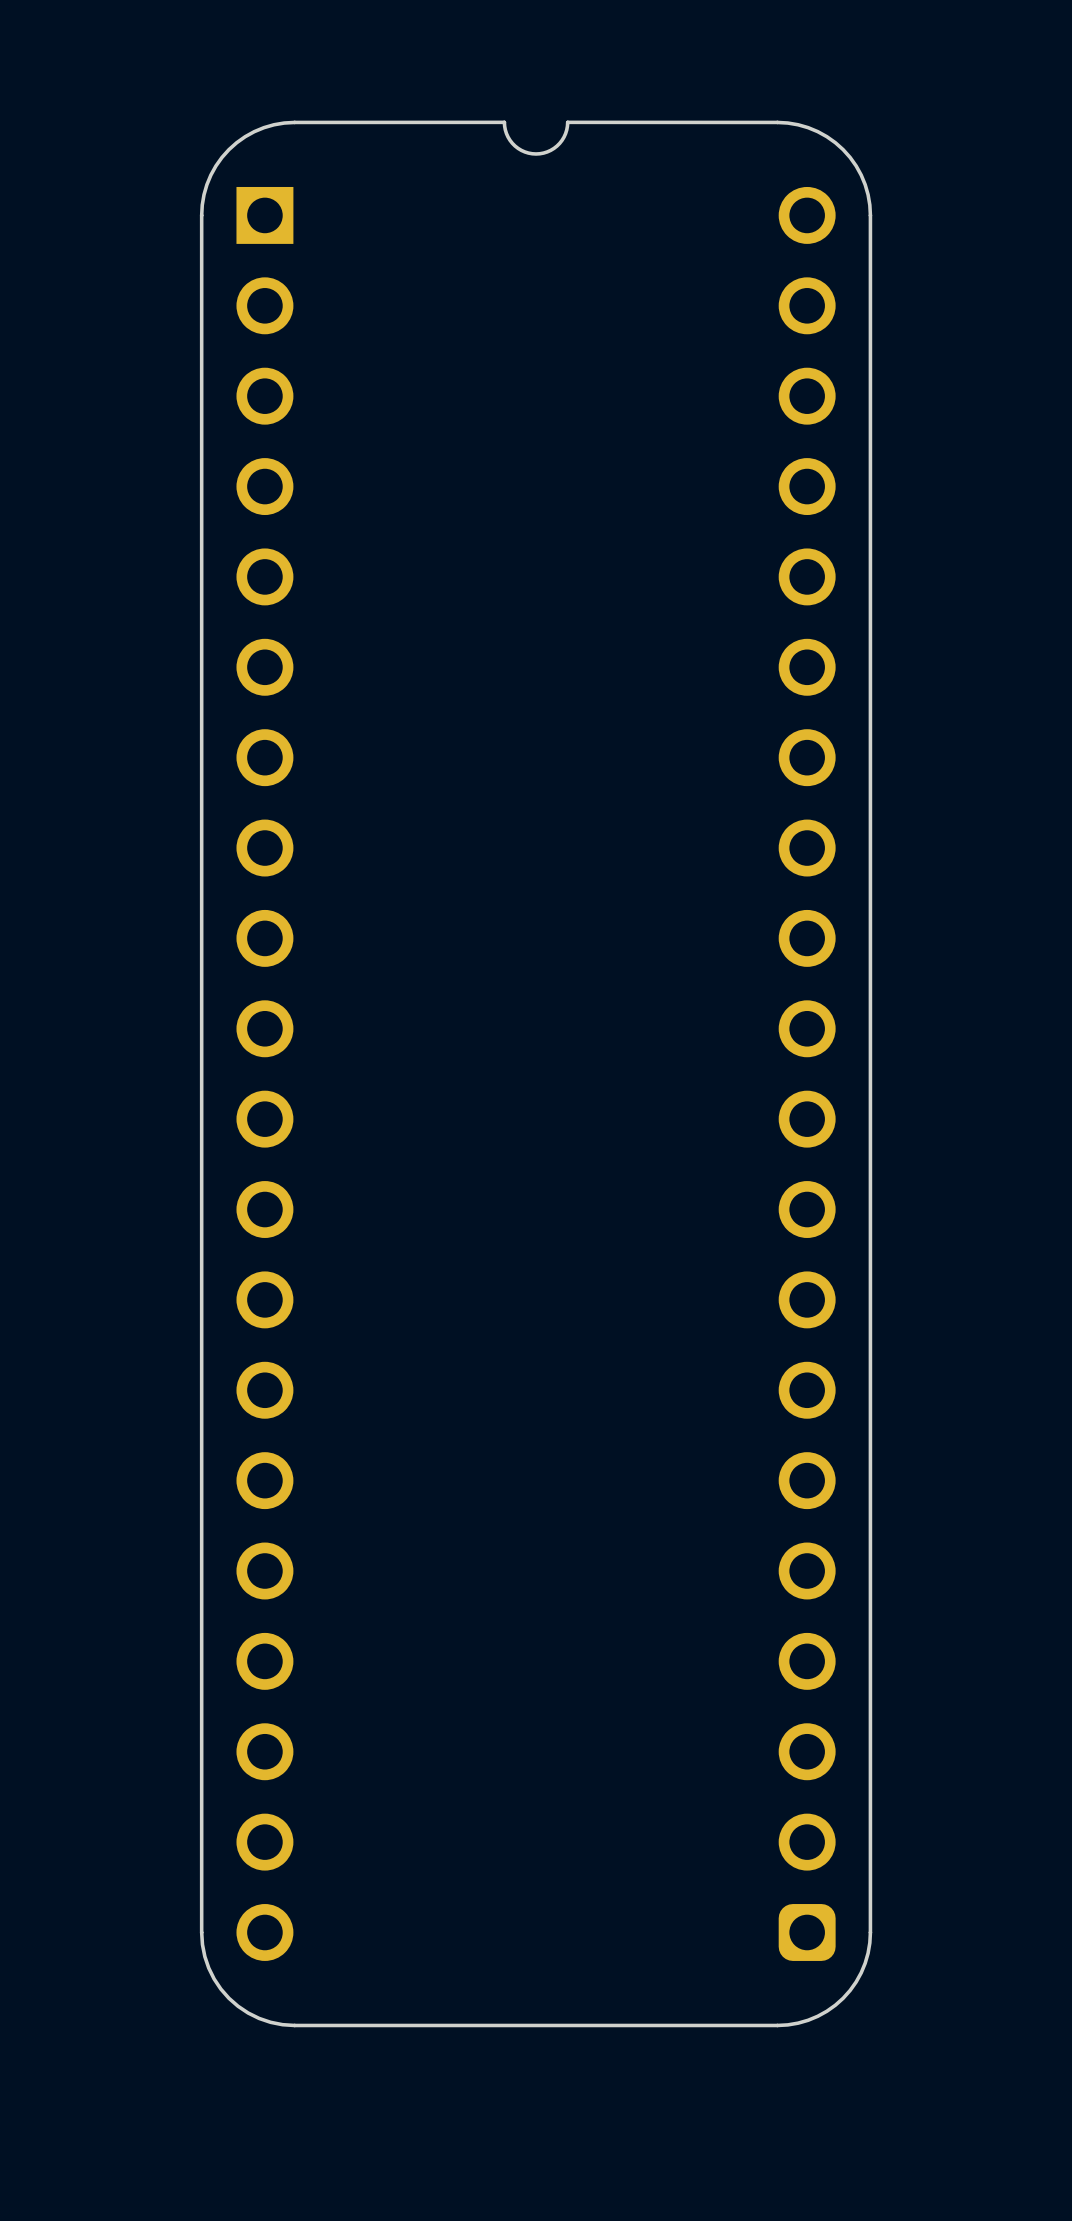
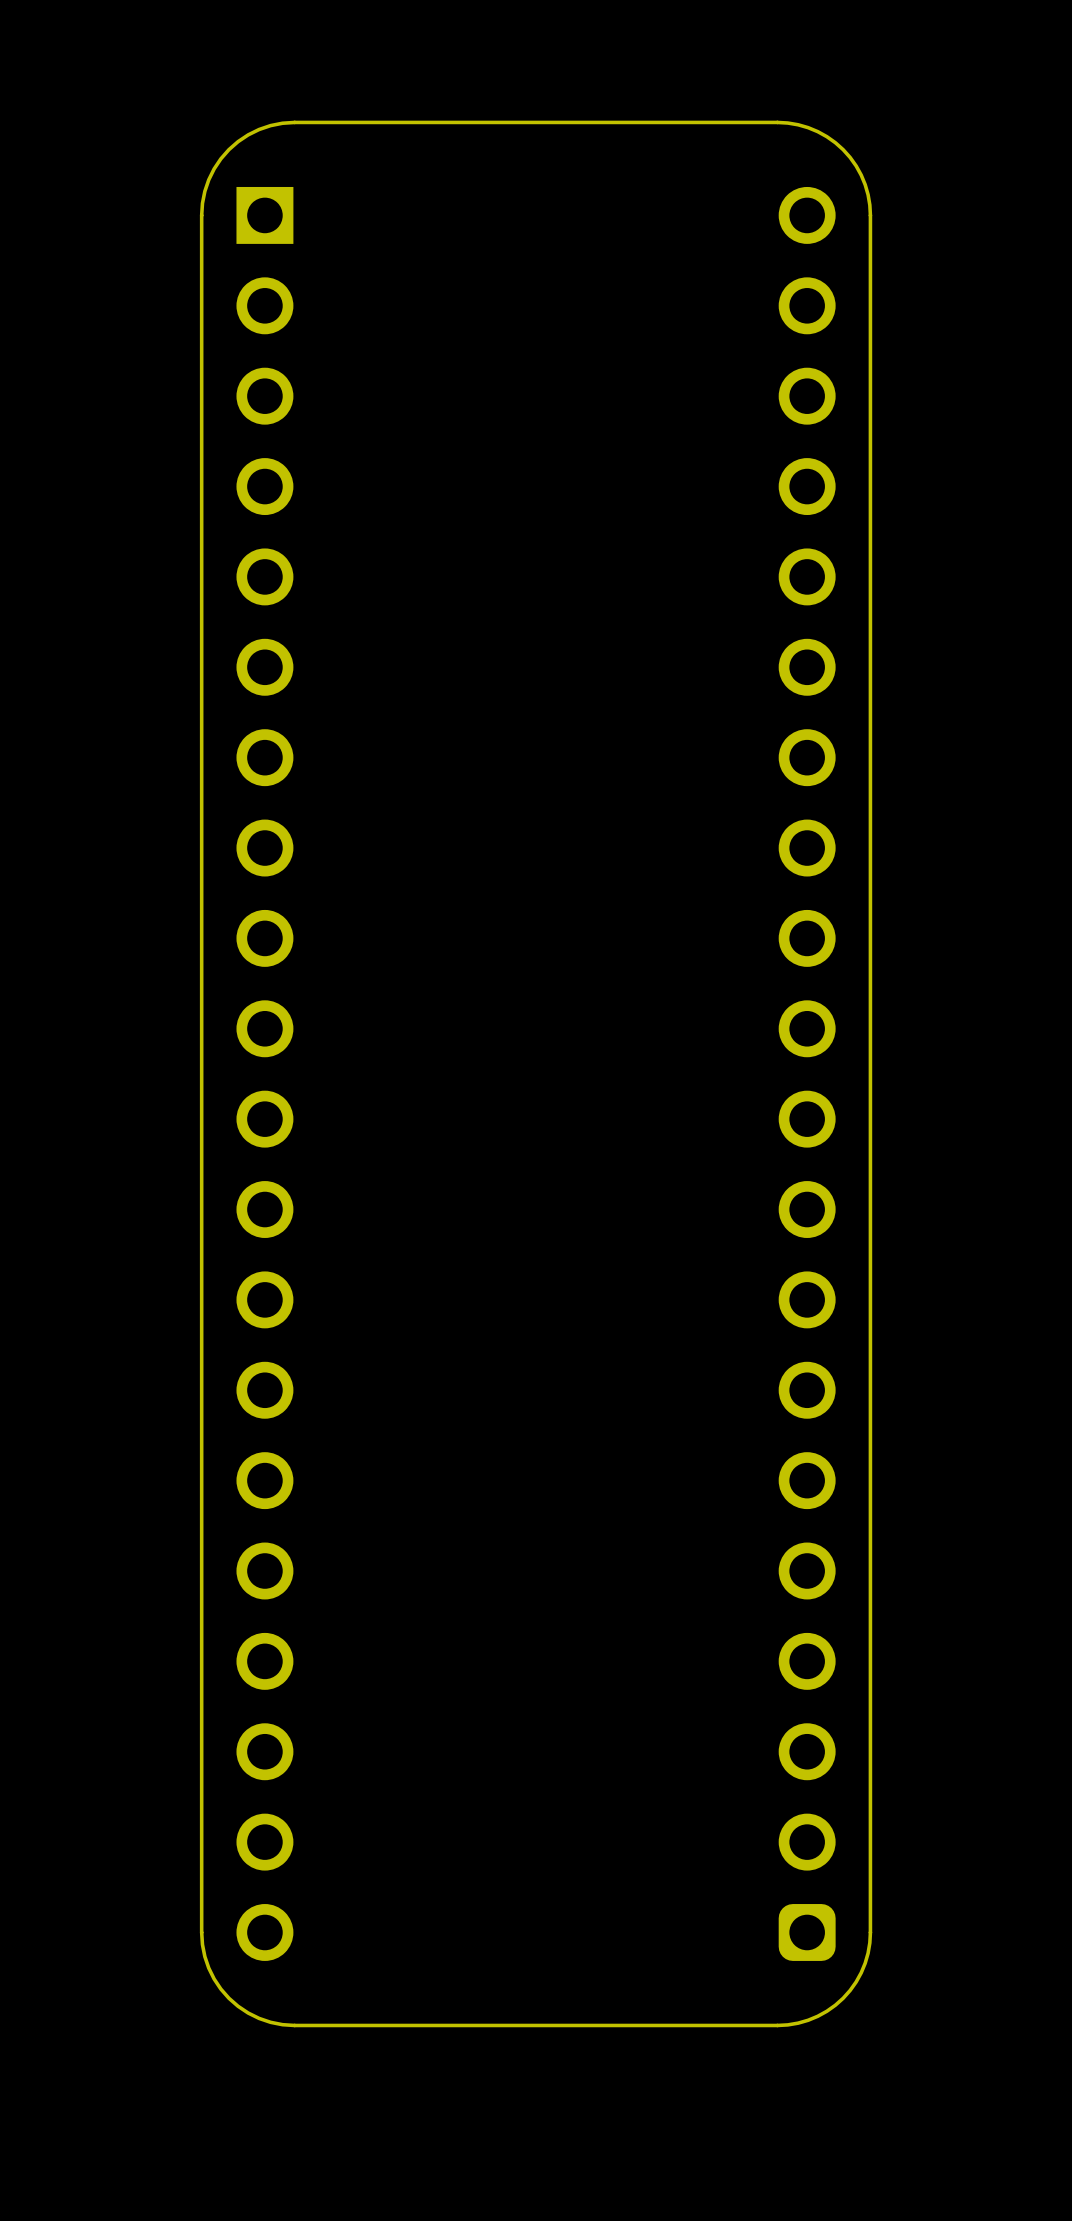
part footprint: [199, 120, 873, 2028] -> [199, 120, 873, 2028]

